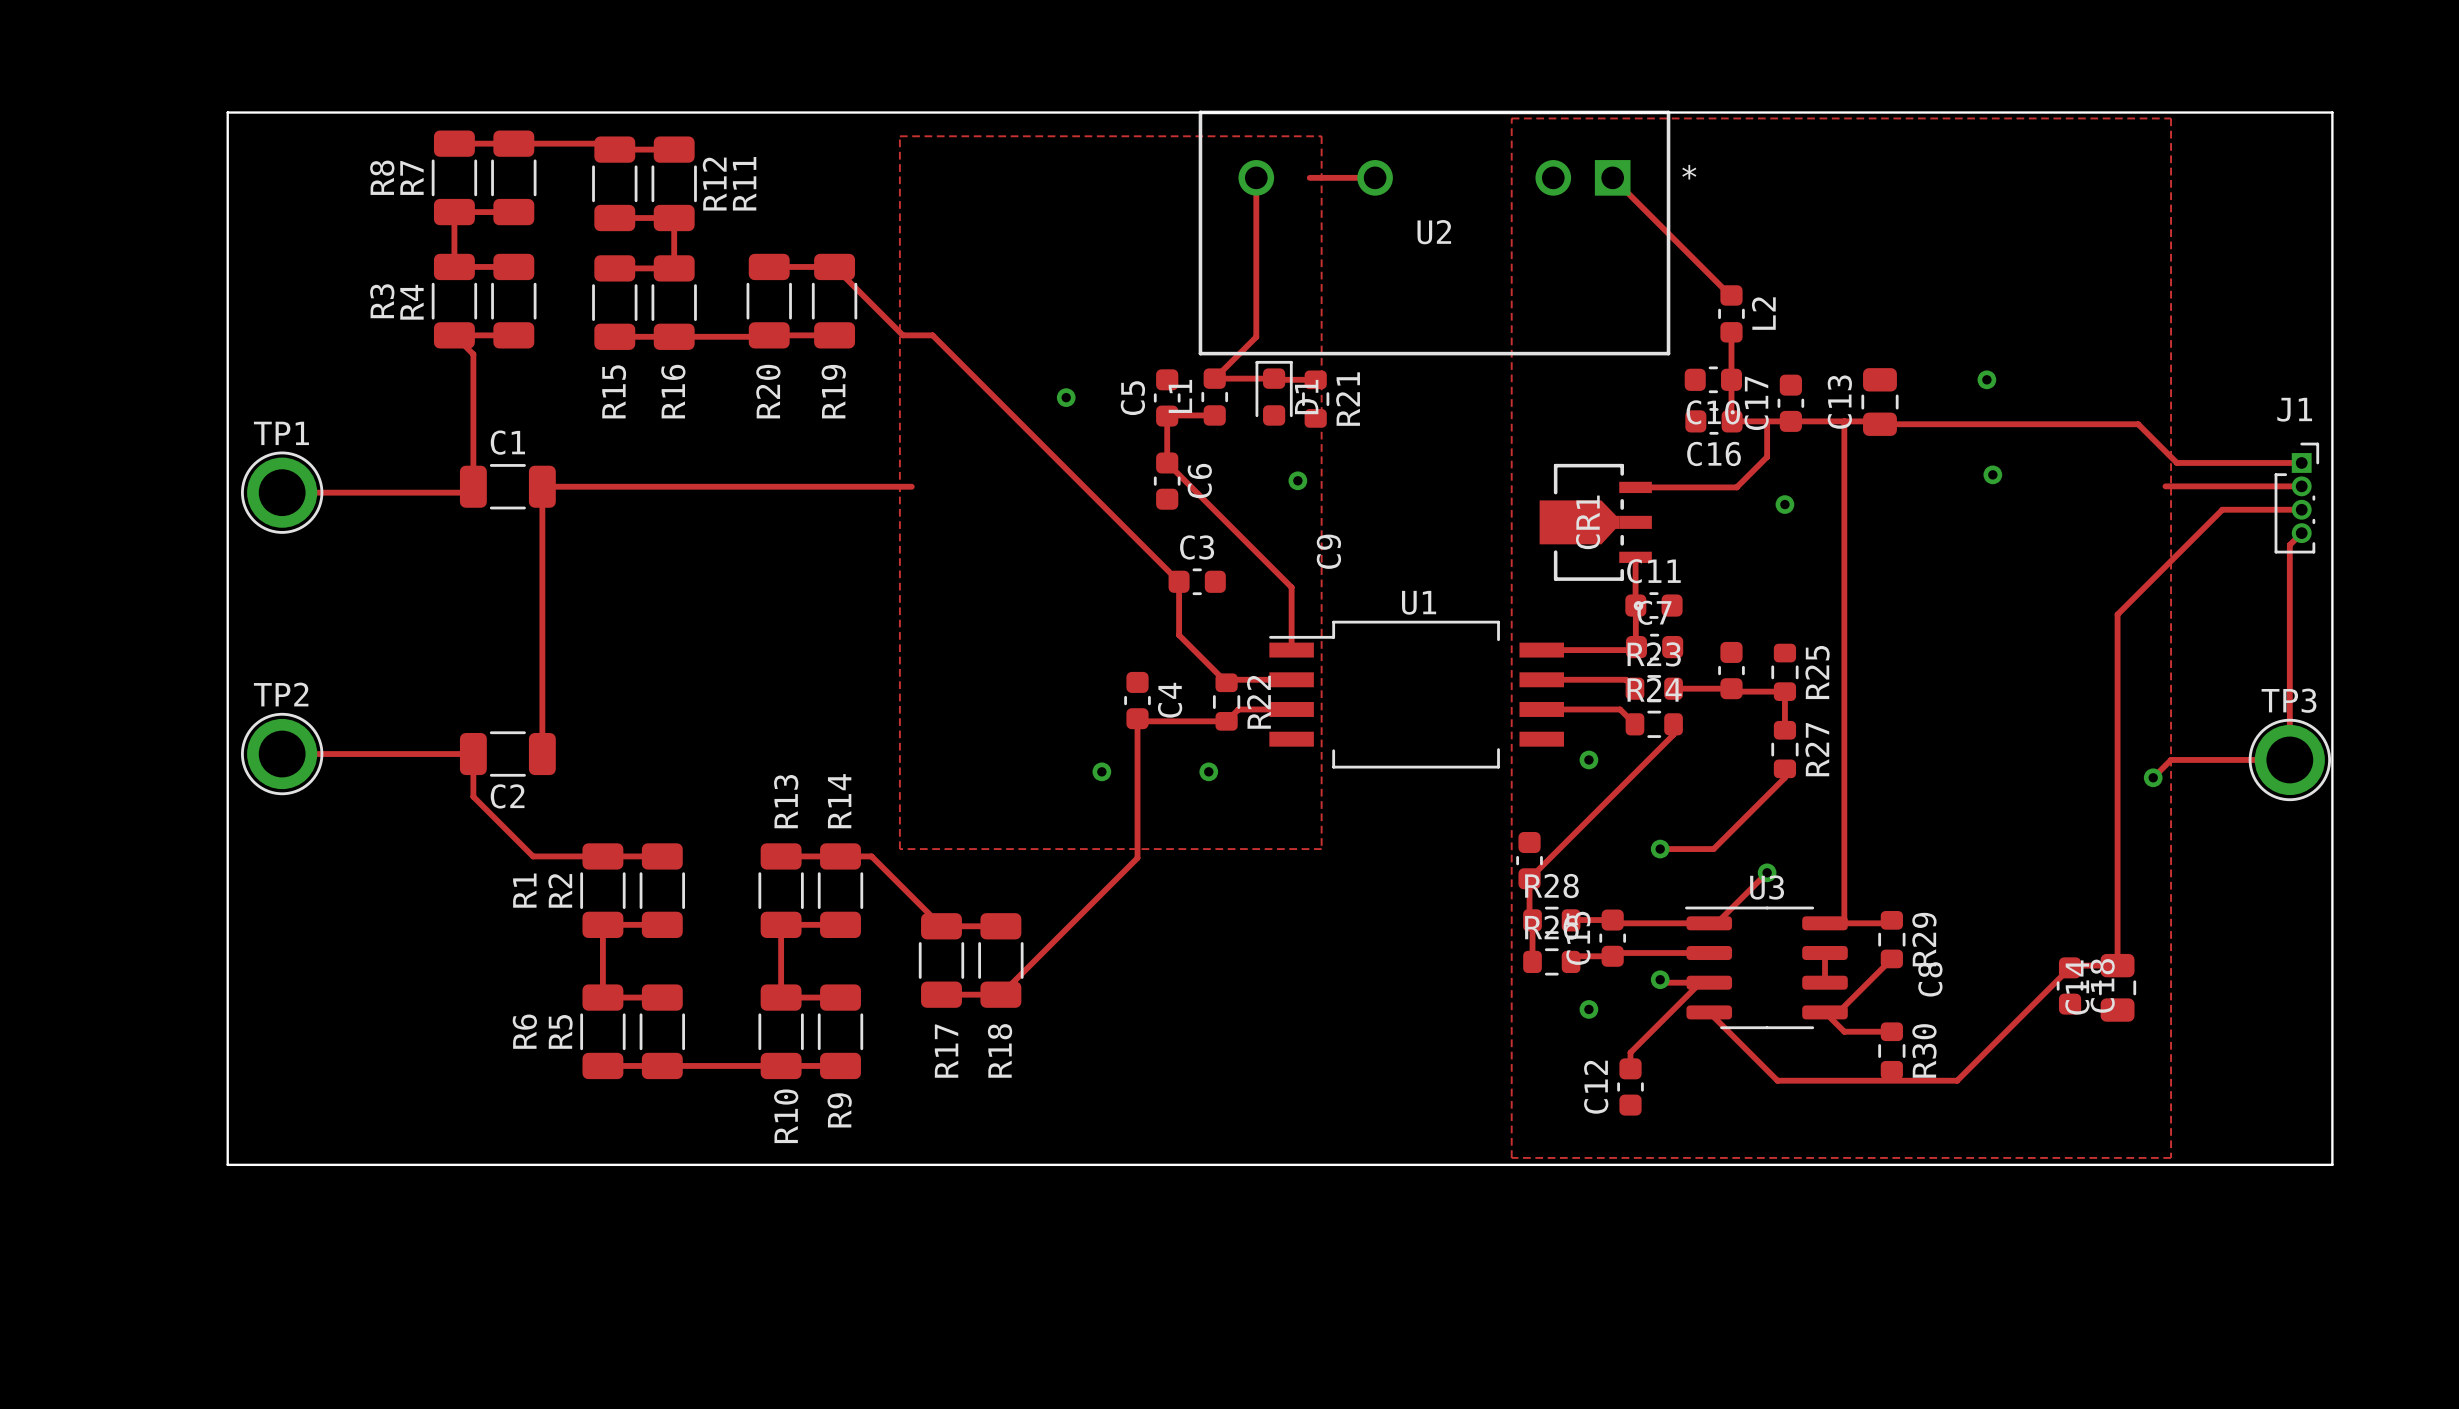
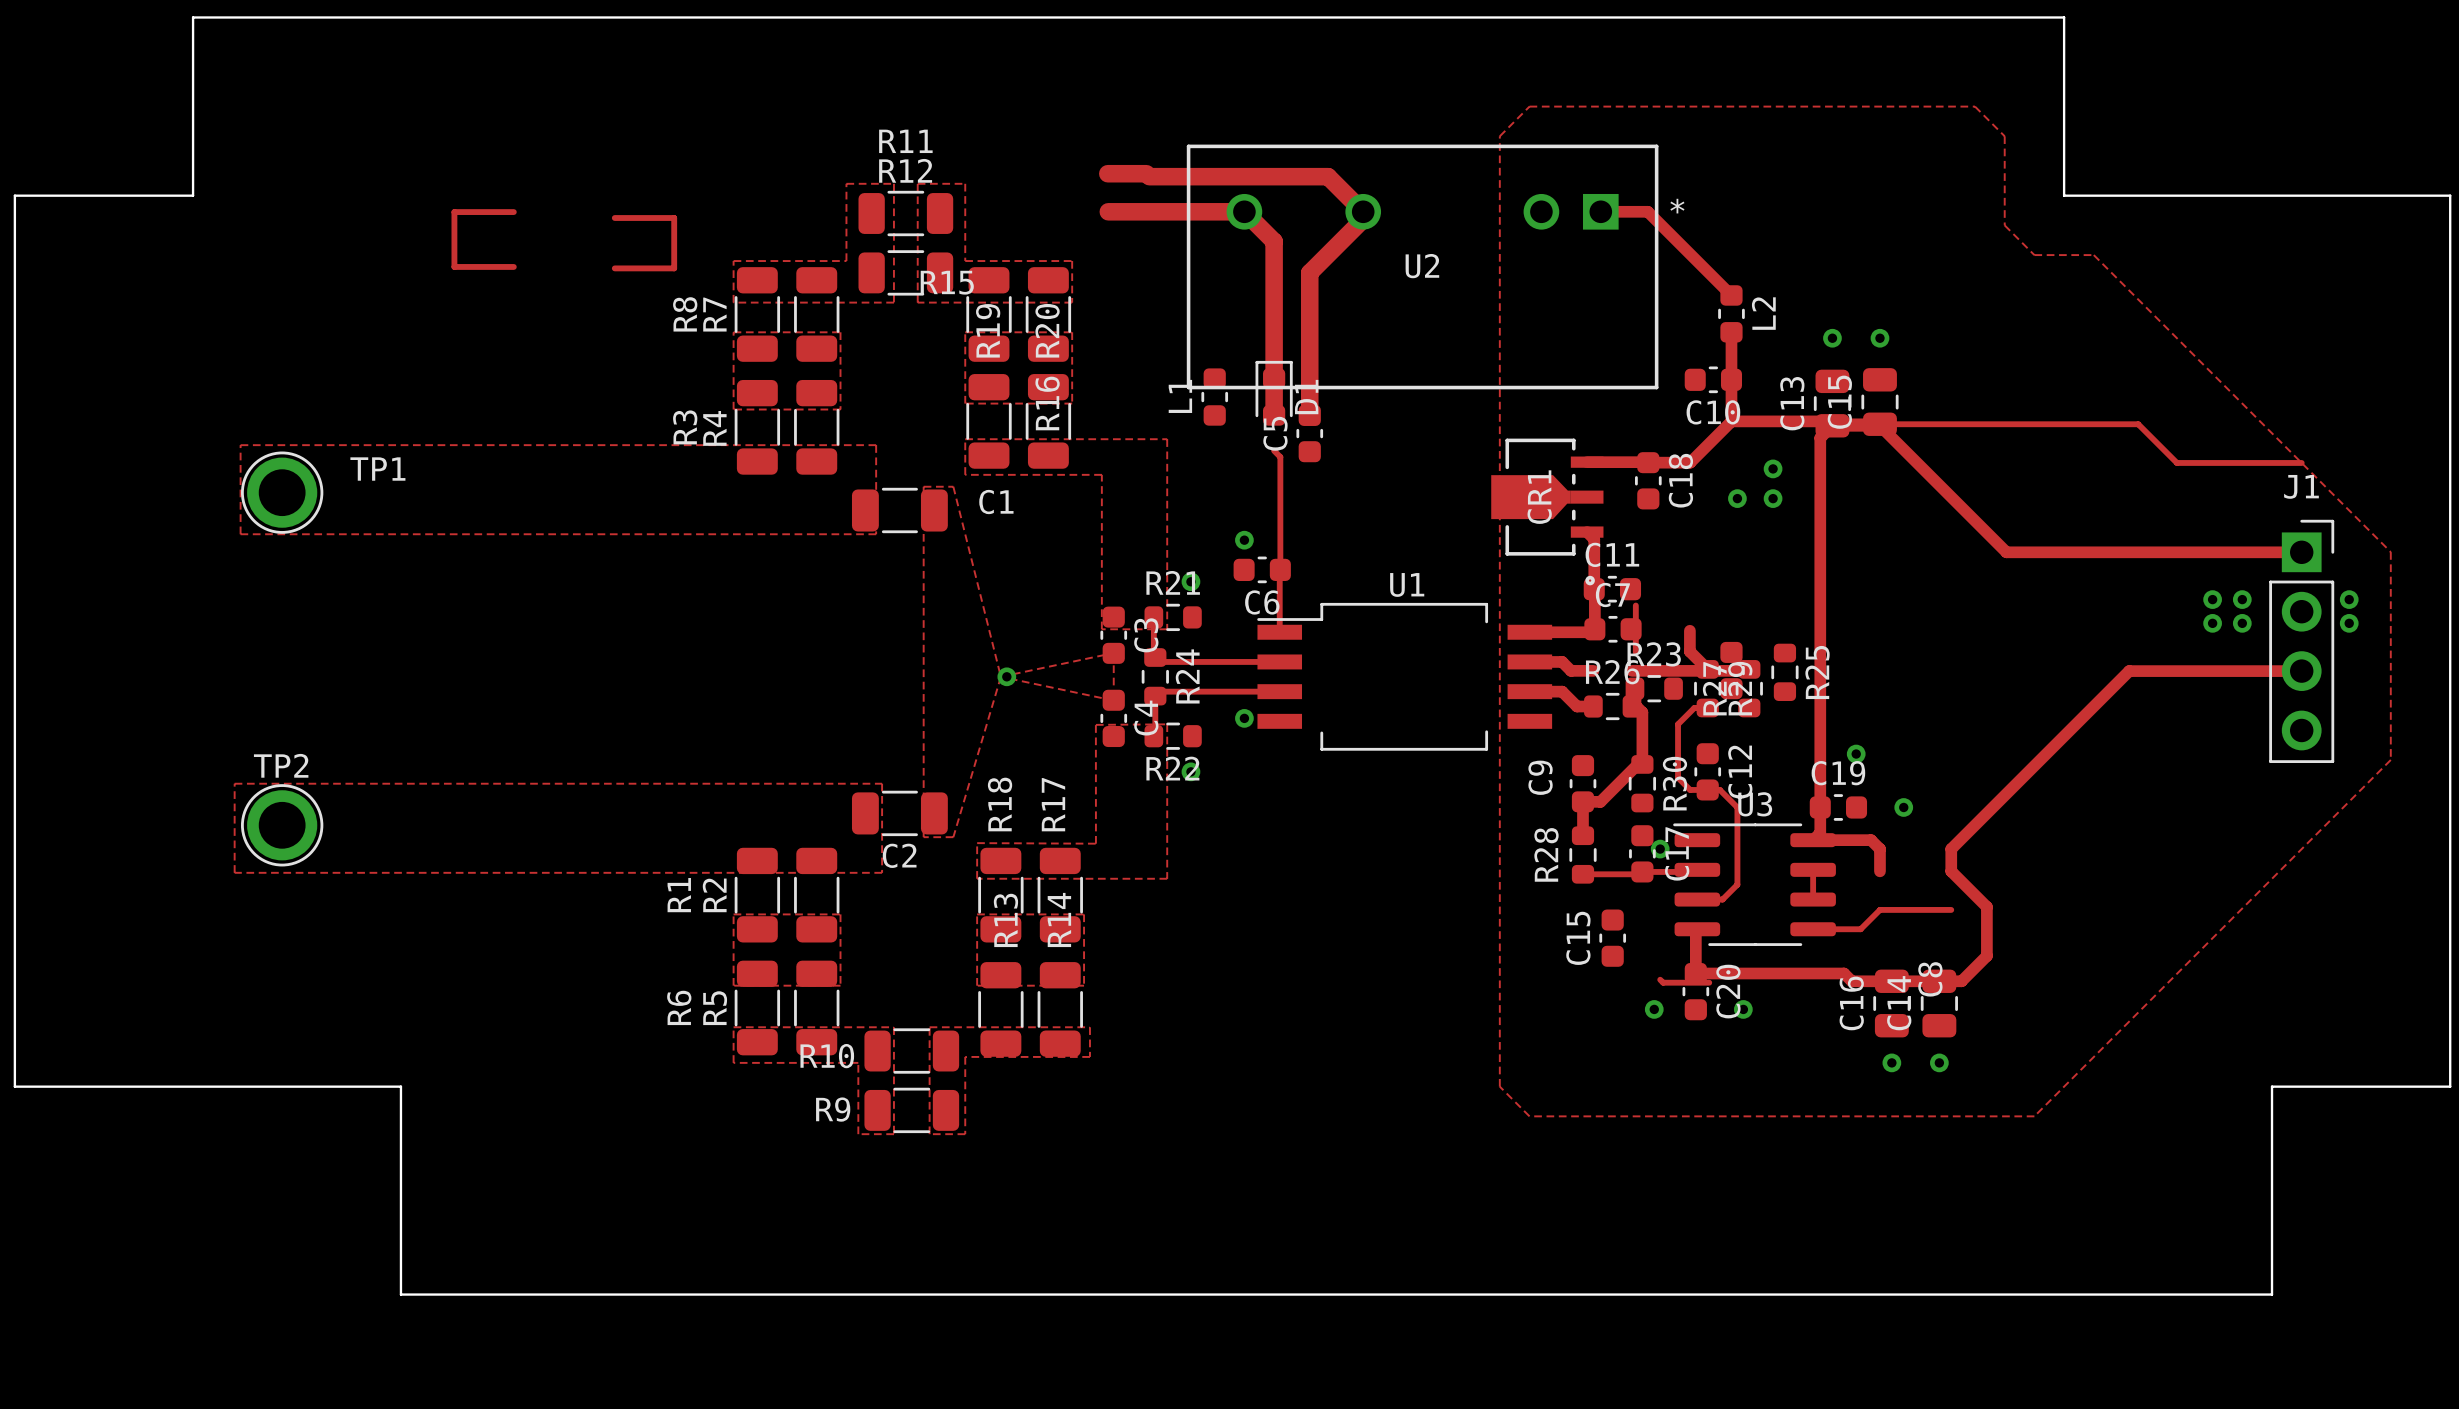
board edge: (227, 112) (2332, 112) (2332, 1164) (227, 1164) (227, 112) -> (193, 17) (193, 195) (14, 195) (14, 1086) (400, 1086) (400, 1294) (2272, 1294) (2272, 1086) (2450, 1086) (2450, 195) (2064, 195) (2064, 17) (193, 17)
zone outline: (1511, 118) (1511, 1157) (2171, 1157) (2171, 118) (1511, 118) -> (1529, 106) (1499, 136) (1499, 1086) (1529, 1116) (2034, 1116) (2390, 759) (2390, 552) (2093, 255) (2034, 255) (2004, 225) (2004, 136) (1975, 106) (1529, 106)
zone outline: (899, 136) (899, 849) (1321, 849) (1321, 136) (899, 136) -> none
track: (454, 143) (608, 143) (614, 149) (674, 149) -> none
track: none -> (1107, 173) (1146, 173) (1149, 176) (1328, 176) (1363, 211) (1363, 219) (1309, 272) (1309, 415)
R8 position: (454, 177) -> (757, 314)
R7 position: (513, 177) -> (816, 314)
track: (1256, 177) (1256, 337) (1214, 378) (1315, 379) -> none
track: (1309, 177) (1375, 177) -> none
track: (1612, 177) (1731, 296) -> none
R12 rotation: 0° (614, 183) -> 90° clockwise (905, 272)
R12 position: (614, 183) -> (905, 272)
R11 rotation: 0° (674, 183) -> 90° clockwise (905, 213)
R11 position: (674, 183) -> (905, 213)
R11 name position: R11 (744, 183) -> R11 (905, 141)
zone outline: none -> (846, 183) (846, 261) (733, 261) (733, 302) (893, 302) (893, 183) (846, 183)
zone outline: none -> (917, 183) (965, 183) (965, 261) (1072, 261) (1072, 302) (917, 302) (917, 183)
R12 name position: R12 (714, 184) -> R12 (905, 170)
track: none -> (1600, 211) (1647, 211) (1731, 295)
track: none -> (1107, 212) (1244, 211) (1274, 241) (1274, 413)
U2 position: (1434, 233) -> (1422, 266)
track: (769, 266) (834, 266) (902, 335) (932, 335) (1179, 581) (1179, 635) (1226, 682) (1229, 679) (1291, 679) -> none
R3 position: (454, 301) -> (757, 427)
R4 position: (513, 301) -> (816, 427)
R20 position: (769, 301) -> (1048, 421)
R19 position: (834, 301) -> (989, 421)
R15 position: (614, 302) -> (989, 314)
R16 position: (674, 302) -> (1048, 314)
zone outline: none -> (733, 332) (733, 409) (840, 409) (840, 332) (733, 332)
zone outline: none -> (965, 332) (965, 403) (1072, 403) (1072, 332) (965, 332)
track width: thin (1731, 332) (1731, 420) -> thick (1731, 332) (1731, 420)
track: (513, 335) (454, 335) (473, 354) (473, 486) -> none
track: (834, 335) (614, 336) -> none
via: none -> (1832, 338)
via: none -> (1879, 338)
via: (1986, 379) -> none
R15 name rotation: 0° (614, 391) -> 90° clockwise (947, 282)
R15 name position: R15 (614, 391) -> R15 (947, 282)
R20 name position: R20 (768, 391) -> R20 (1047, 330)
R19 name position: R19 (833, 391) -> R19 (988, 330)
via: (1066, 397) -> none
C5 position: (1167, 397) -> (1309, 433)
R21 rotation: 0° (1315, 399) -> 90° clockwise (1173, 617)
R21 position: (1315, 399) -> (1173, 617)
R21 name position: R21 (1348, 399) -> R21 (1173, 582)
C13 name: C13 (1839, 402) -> C15 (1839, 402)
C17 name position: C17 (1756, 403) -> C17 (1677, 853)
C17 position: (1790, 403) -> (1642, 853)
C13: none -> (1832, 403)
C16 footprint: [1685, 408, 1743, 435] -> [1873, 969, 1911, 1038]
J1 name position: J1 (2294, 409) -> J1 (2301, 486)
track: (1214, 415) (1167, 415) (1167, 462) (1291, 587) (1291, 650) -> none
track: none -> (1731, 421) (1690, 462) (1587, 462)
track width: thin (1732, 421) (1828, 421) -> thick (1732, 421) (1828, 421)
track: (1767, 421) (1767, 457) (1736, 487) (1635, 487) -> none
track: (1844, 421) (1844, 920) -> none
TP1 name position: TP1 (281, 433) -> TP1 (377, 469)
zone outline: none -> (965, 439) (965, 474) (1101, 474) (1101, 629) (1167, 629) (1167, 439) (965, 439)
C1 name position: C1 (507, 442) -> C1 (996, 502)
J1 footprint: [2274, 442, 2320, 554] -> [2269, 519, 2335, 764]
zone outline: none -> (240, 445) (240, 534) (876, 534) (876, 445) (240, 445)
track: none -> (1274, 450) (1280, 457) (1279, 632)
C16 name position: C16 (1714, 453) -> C16 (1851, 1003)
via: none -> (1773, 468)
via: (1992, 474) -> none
via: (1297, 480) -> none
C6 rotation: 0° (1167, 481) -> 90° clockwise (1262, 569)
C6 position: (1167, 481) -> (1262, 569)
C1 position: (507, 486) -> (899, 510)
track: (911, 486) (542, 486) (542, 754) -> none
track: (2165, 486) (2301, 486) -> none
track: (478, 491) (282, 492) -> none
via: none -> (1737, 498)
via position: (1784, 504) -> (1773, 498)
track: (2301, 509) (2222, 509) (2117, 614) (2117, 965) (2072, 965) (1957, 1080) (1777, 1080) (1709, 1012) -> none
track: none -> (1587, 532) (1594, 539) (1594, 629) (1591, 632) (1529, 632)
track: (2301, 533) (2289, 545) (2289, 759) (2171, 759) (2153, 777) -> none
CR1 position: (1595, 537) -> (1547, 511)
via: none -> (1244, 540)
C9 name position: C9 (1328, 551) -> C9 (1540, 777)
track: none -> (2301, 552) (2006, 552) (1879, 425) (1832, 425) (1820, 437) (1820, 832) (1813, 840) (1871, 840) (1879, 849) (1879, 871)
track: (1635, 557) (1635, 604) -> none
via: none -> (1190, 581)
C3 rotation: 0° (1197, 581) -> 90° clockwise (1113, 635)
C3 position: (1197, 581) -> (1113, 635)
via: none -> (2212, 599)
via: none -> (2242, 599)
via: none -> (2349, 599)
C11 position: (1653, 605) -> (1612, 589)
track: none -> (1153, 617) (1153, 656) (1159, 661) (1279, 661)
via: none -> (2212, 623)
via: none -> (2242, 623)
via: none -> (2349, 623)
track: none -> (1689, 630) (1689, 651) (1707, 669)
C7 position: (1654, 647) -> (1612, 629)
track: (1541, 650) (1633, 650) (1636, 653) -> none
track: none -> (1529, 661) (1562, 661) (1571, 670) (1593, 670)
track: none -> (1749, 669) (1631, 670)
track: none -> (2301, 671) (2129, 671) (1951, 849) (1951, 871) (1986, 906) (1986, 955) (1961, 981) (1851, 981) (1844, 973) (1695, 973) (1697, 929)
zone outline: none -> (1000, 676) (1113, 700) (1113, 653) (1000, 676)
zone outline: none -> (1000, 676) (953, 837) (923, 837) (923, 486) (953, 486) (1000, 676)
via: none -> (1006, 676)
track: (1541, 679) (1626, 679) (1634, 688) -> none
track: (1673, 688) (1731, 688) (1734, 691) (1784, 691) (1784, 730) -> none
track: none -> (1279, 691) (1159, 691) (1155, 696) (1153, 736)
track: none -> (1529, 691) (1562, 691) (1577, 706) (1593, 706)
U1 position: (1416, 694) -> (1404, 676)
C4 position: (1137, 700) -> (1113, 718)
R22 rotation: 0° (1226, 702) -> 90° clockwise (1173, 736)
R22 position: (1226, 702) -> (1173, 736)
track: none -> (1631, 706) (1636, 706) (1642, 712) (1642, 764) (1637, 764) (1600, 801) (1582, 801) (1582, 835)
track: none -> (1707, 707) (1694, 707) (1678, 724) (1678, 777) (1690, 789) (1719, 789) (1737, 807) (1737, 884) (1722, 899) (1697, 899)
track: (1291, 709) (1238, 709) (1226, 721) (1140, 721) (1137, 724) -> none
track: (1541, 709) (1620, 709) (1634, 724) -> none
track: (1137, 718) (1137, 858) (1000, 994) (941, 994) -> none
via: none -> (1244, 718)
zone outline: none -> (1167, 724) (1167, 878) (977, 878) (977, 843) (1095, 843) (1095, 724) (1167, 724)
R24 rotation: 0° (1654, 724) -> 90° clockwise (1155, 676)
R24 position: (1654, 724) -> (1155, 676)
track: (1673, 724) (1673, 734) (1529, 878) (1532, 961) -> none
R27 position: (1784, 749) -> (1749, 688)
R27 name position: R27 (1817, 749) -> R27 (1714, 688)
track: (282, 754) (473, 754) (473, 796) (533, 856) (662, 856) -> none
TP2 position: (282, 754) -> (282, 825)
C2 position: (507, 754) -> (899, 813)
via: none -> (1856, 754)
via: (1588, 759) -> none
TP3: (2289, 759) -> none
track: (1784, 768) (1784, 777) (1713, 849) (1660, 849) -> none
via: (1101, 771) -> none
via position: (1208, 771) -> (1190, 771)
via: (2153, 777) -> none
zone outline: none -> (234, 783) (234, 872) (882, 872) (882, 783) (234, 783)
C19: none -> (1838, 807)
via: none -> (1903, 807)
track: (781, 856) (871, 856) (941, 926) (1000, 926) -> none
C9 position: (1529, 860) -> (1582, 783)
track: none -> (1697, 869) (1695, 871) (1642, 871) (1640, 874) (1582, 874)
track: (1767, 872) (1716, 923) (1615, 923) (1612, 920) (1571, 920) -> none
via: (1767, 872) -> none
R28 name position: R28 (1551, 886) -> R28 (1546, 854)
R1 position: (602, 890) -> (757, 895)
R2 position: (662, 890) -> (816, 895)
R13 position: (781, 890) -> (1000, 1009)
R14 position: (840, 890) -> (1060, 1009)
track: none -> (1951, 909) (1879, 909) (1860, 929) (1813, 929)
zone outline: none -> (733, 914) (733, 985) (840, 985) (840, 914) (733, 914)
zone outline: none -> (977, 914) (1084, 914) (1084, 985) (977, 985) (977, 914)
R28 rotation: 0° (1551, 920) -> 90° clockwise (1582, 855)
R28 position: (1551, 920) -> (1582, 855)
track: (1891, 920) (1888, 923) (1825, 923) -> none
track: (662, 924) (602, 924) (602, 997) (662, 997) -> none
track: (840, 924) (781, 924) (781, 997) (840, 997) -> none
R29 position: (1891, 939) -> (1707, 688)
track: (1709, 953) (1615, 953) (1612, 956) (1576, 956) (1571, 961) -> none
track: (1825, 953) (1825, 982) -> (1813, 869) (1813, 899)
track: (1891, 958) (1838, 1012) (1825, 1012) (1844, 1031) (1891, 1031) -> none
R17 position: (941, 960) -> (1060, 895)
R18 position: (1000, 960) -> (1000, 895)
R26 position: (1551, 961) -> (1612, 706)
U3 position: (1766, 967) -> (1754, 884)
via position: (1660, 979) -> (1654, 1009)
track: (1700, 982) (1630, 1052) (1630, 1068) -> none
C18 position: (2070, 985) -> (1648, 480)
C14 position: (2117, 987) -> (1939, 1003)
C20: none -> (1695, 991)
via: (1588, 1009) -> none
via: none -> (1743, 1009)
zone outline: none -> (733, 1027) (733, 1062) (858, 1062) (858, 1134) (893, 1134) (893, 1027) (733, 1027)
zone outline: none -> (929, 1027) (1089, 1027) (1089, 1056) (965, 1056) (965, 1134) (929, 1134) (929, 1027)
R6 position: (602, 1031) -> (757, 1008)
R5 position: (662, 1031) -> (816, 1008)
R10 rotation: 0° (781, 1031) -> 90° clockwise (911, 1051)
R10 position: (781, 1031) -> (911, 1051)
R9 rotation: 0° (840, 1031) -> 90° clockwise (911, 1110)
R9 position: (840, 1031) -> (911, 1110)
R18 name position: R18 (1000, 1050) -> R18 (1000, 804)
R17 name position: R17 (946, 1051) -> R17 (1053, 804)
R30 position: (1891, 1051) -> (1642, 783)
via: none -> (1891, 1062)
via: none -> (1939, 1062)
track: (602, 1065) (840, 1065) -> none
C12 position: (1630, 1086) -> (1707, 771)
C12 name position: C12 (1596, 1087) -> C12 (1740, 772)

